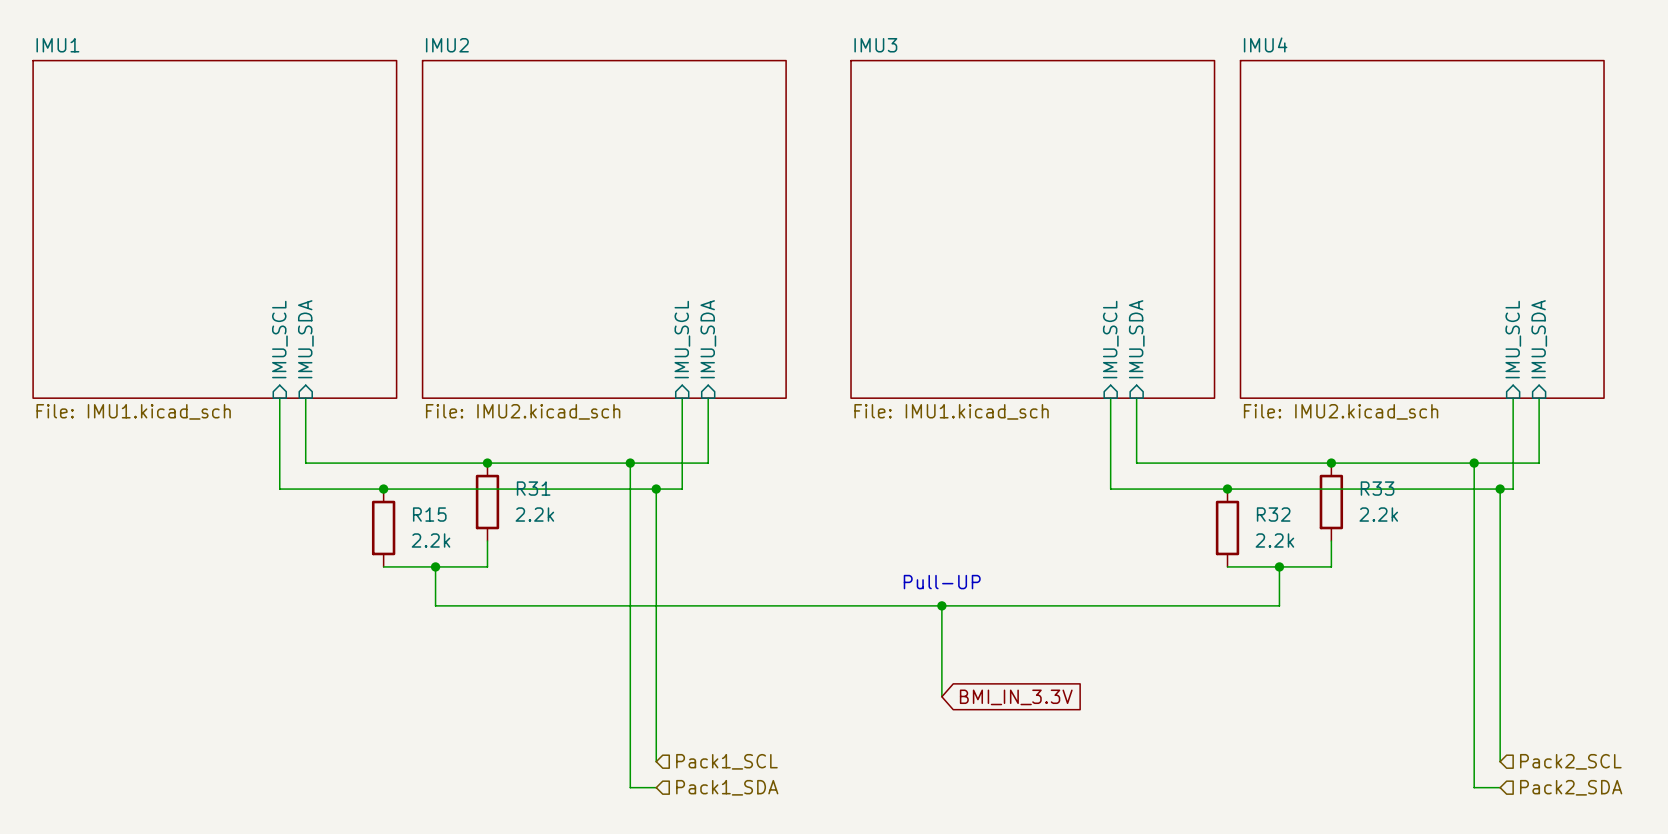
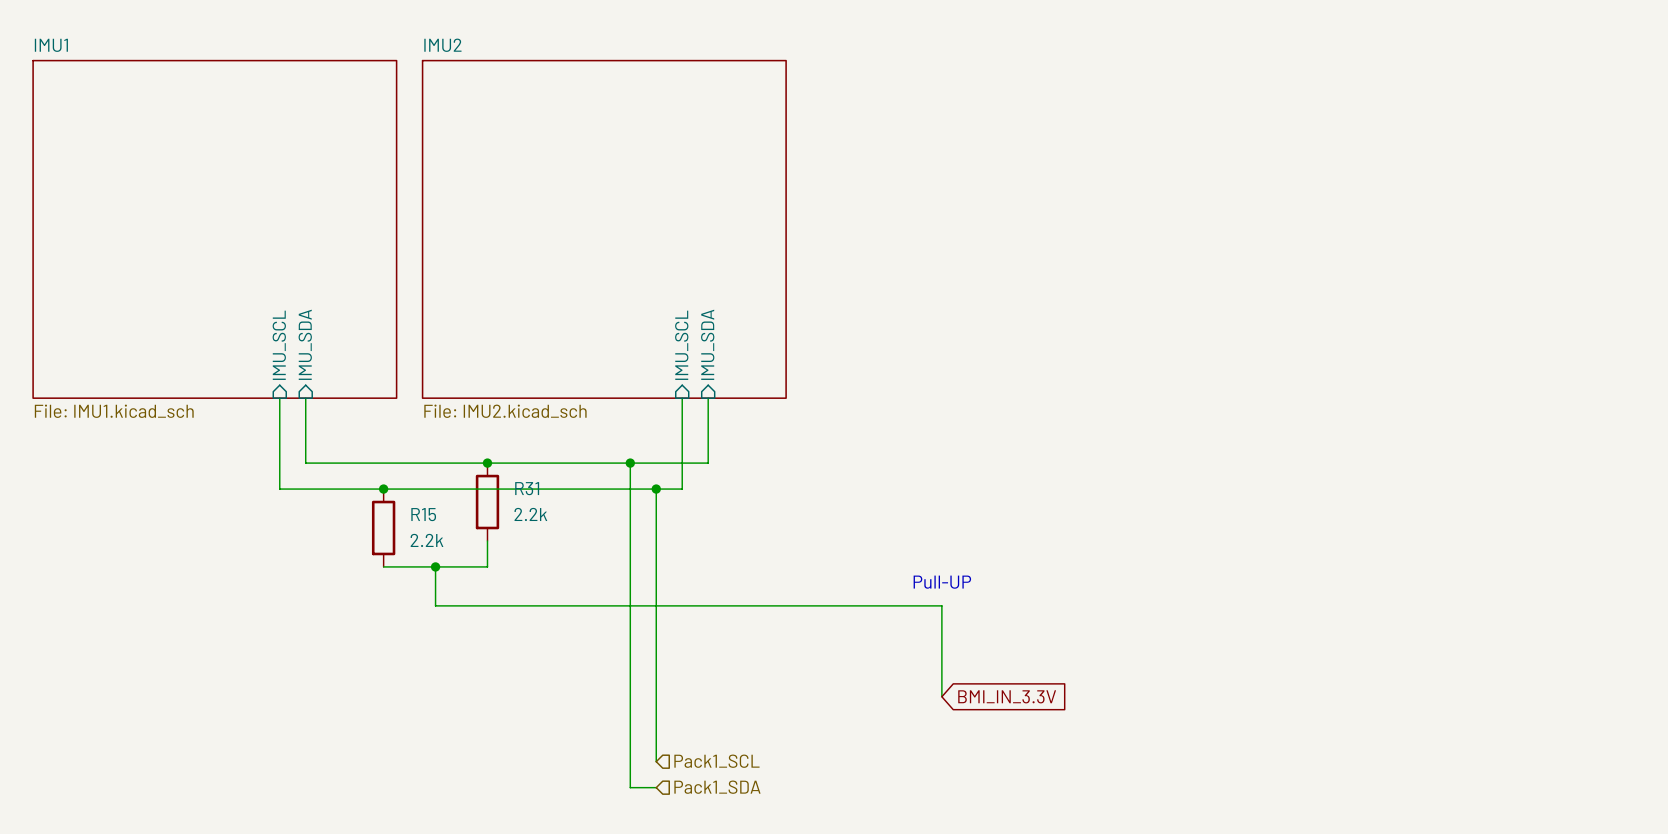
sheet IMU3: File: IMU1.kicad_sch (1032, 229) -> none
sheet IMU4: File: IMU2.kicad_sch (1422, 229) -> none
sheet pin: IMU_SCL (1110, 339) -> none
sheet pin: IMU_SDA (1136, 339) -> none
sheet pin: IMU_SCL (1513, 339) -> none
sheet pin: IMU_SDA (1539, 339) -> none
wire: (1110, 398) (1110, 489) (1513, 489) (1513, 398) -> none
wire: (1136, 398) (1136, 463) (1539, 463) (1539, 398) -> none
junction: (1331, 463) -> none
wire: (1474, 463) (1474, 787) (1500, 787) -> none
junction: (1474, 463) -> none
junction: (1227, 489) -> none
wire: (1500, 489) (1500, 761) -> none
junction: (1500, 489) -> none
R33: 2.2k (1331, 502) -> none
R32: 2.2k (1227, 528) -> none
wire: (1331, 540) (1331, 566) (1227, 566) -> none
wire: (1279, 566) (1279, 605) (941, 605) -> none
junction: (1279, 566) -> none
junction: (941, 605) -> none
hierarchical label: Pack2_SCL (1570, 761) -> none
hierarchical label: Pack2_SDA (1571, 787) -> none

